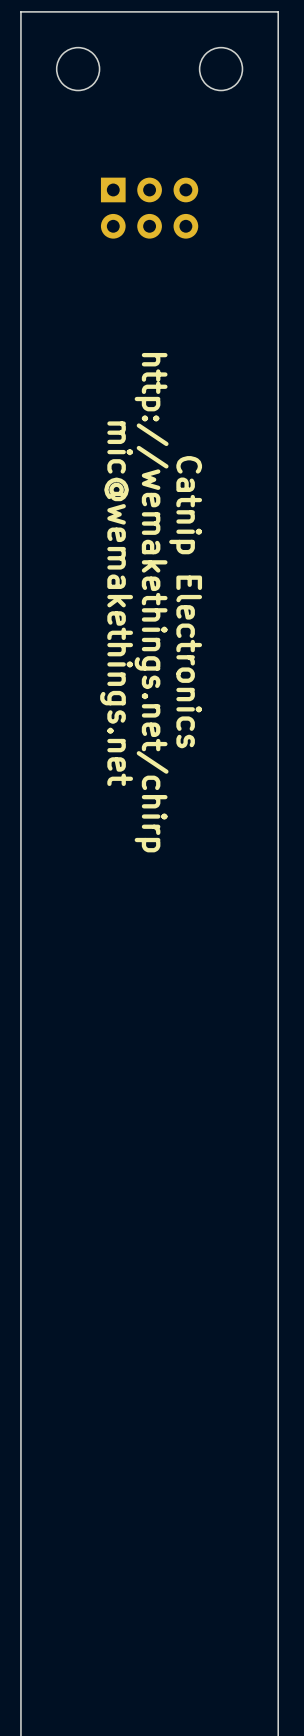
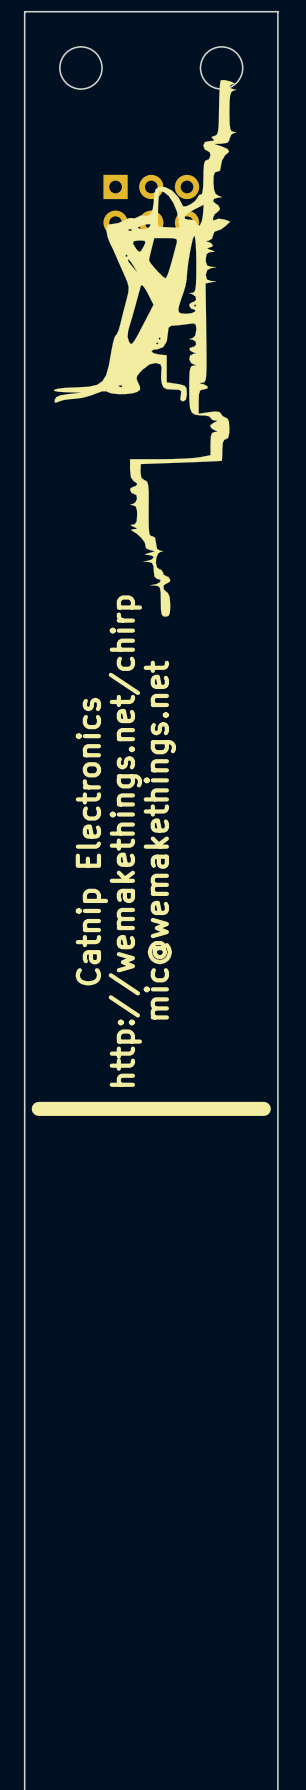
drawing: none -> [54, 79, 237, 617]
text rotation: 0° (151, 602) -> 180° (125, 841)
text rotation: 0° (185, 602) -> 180° (91, 841)
text rotation: 0° (116, 603) -> 180° (159, 840)
line: none -> (263, 1108) (38, 1108)

